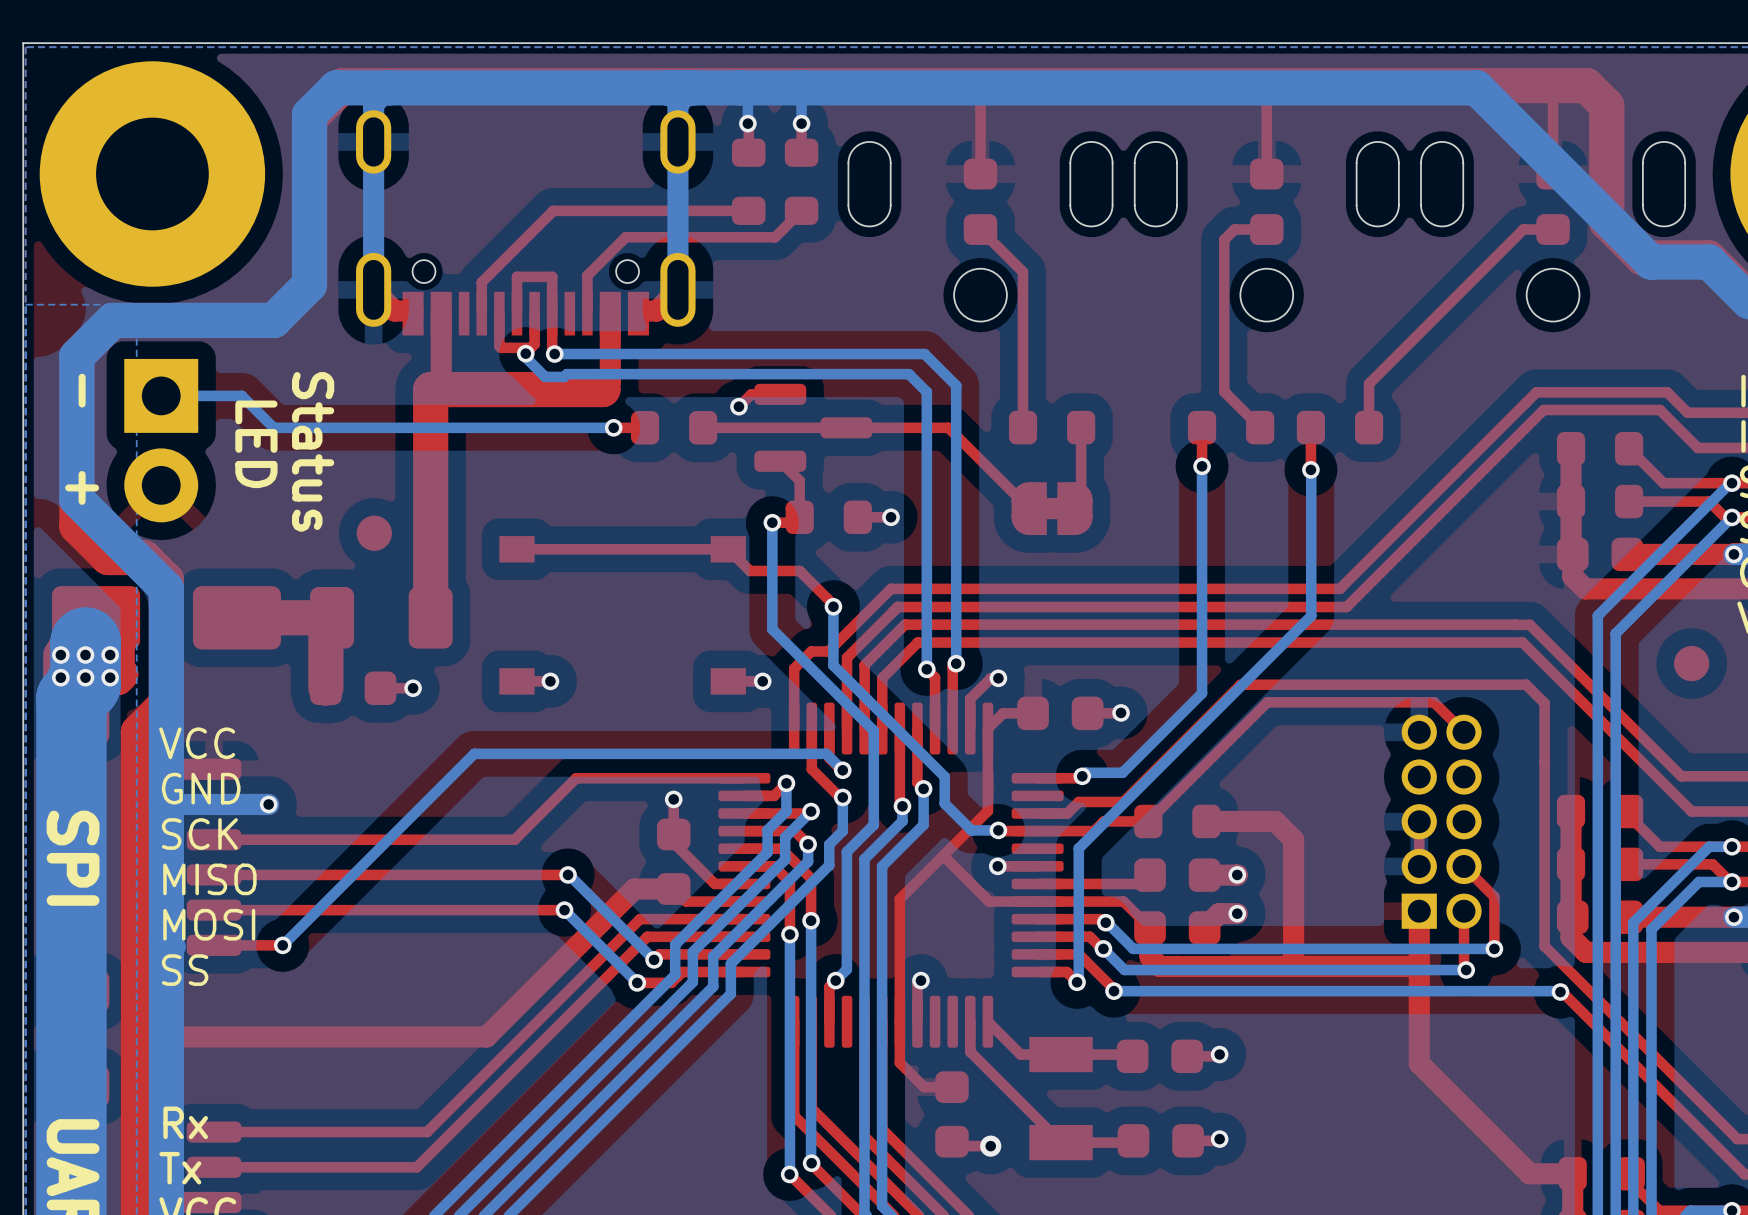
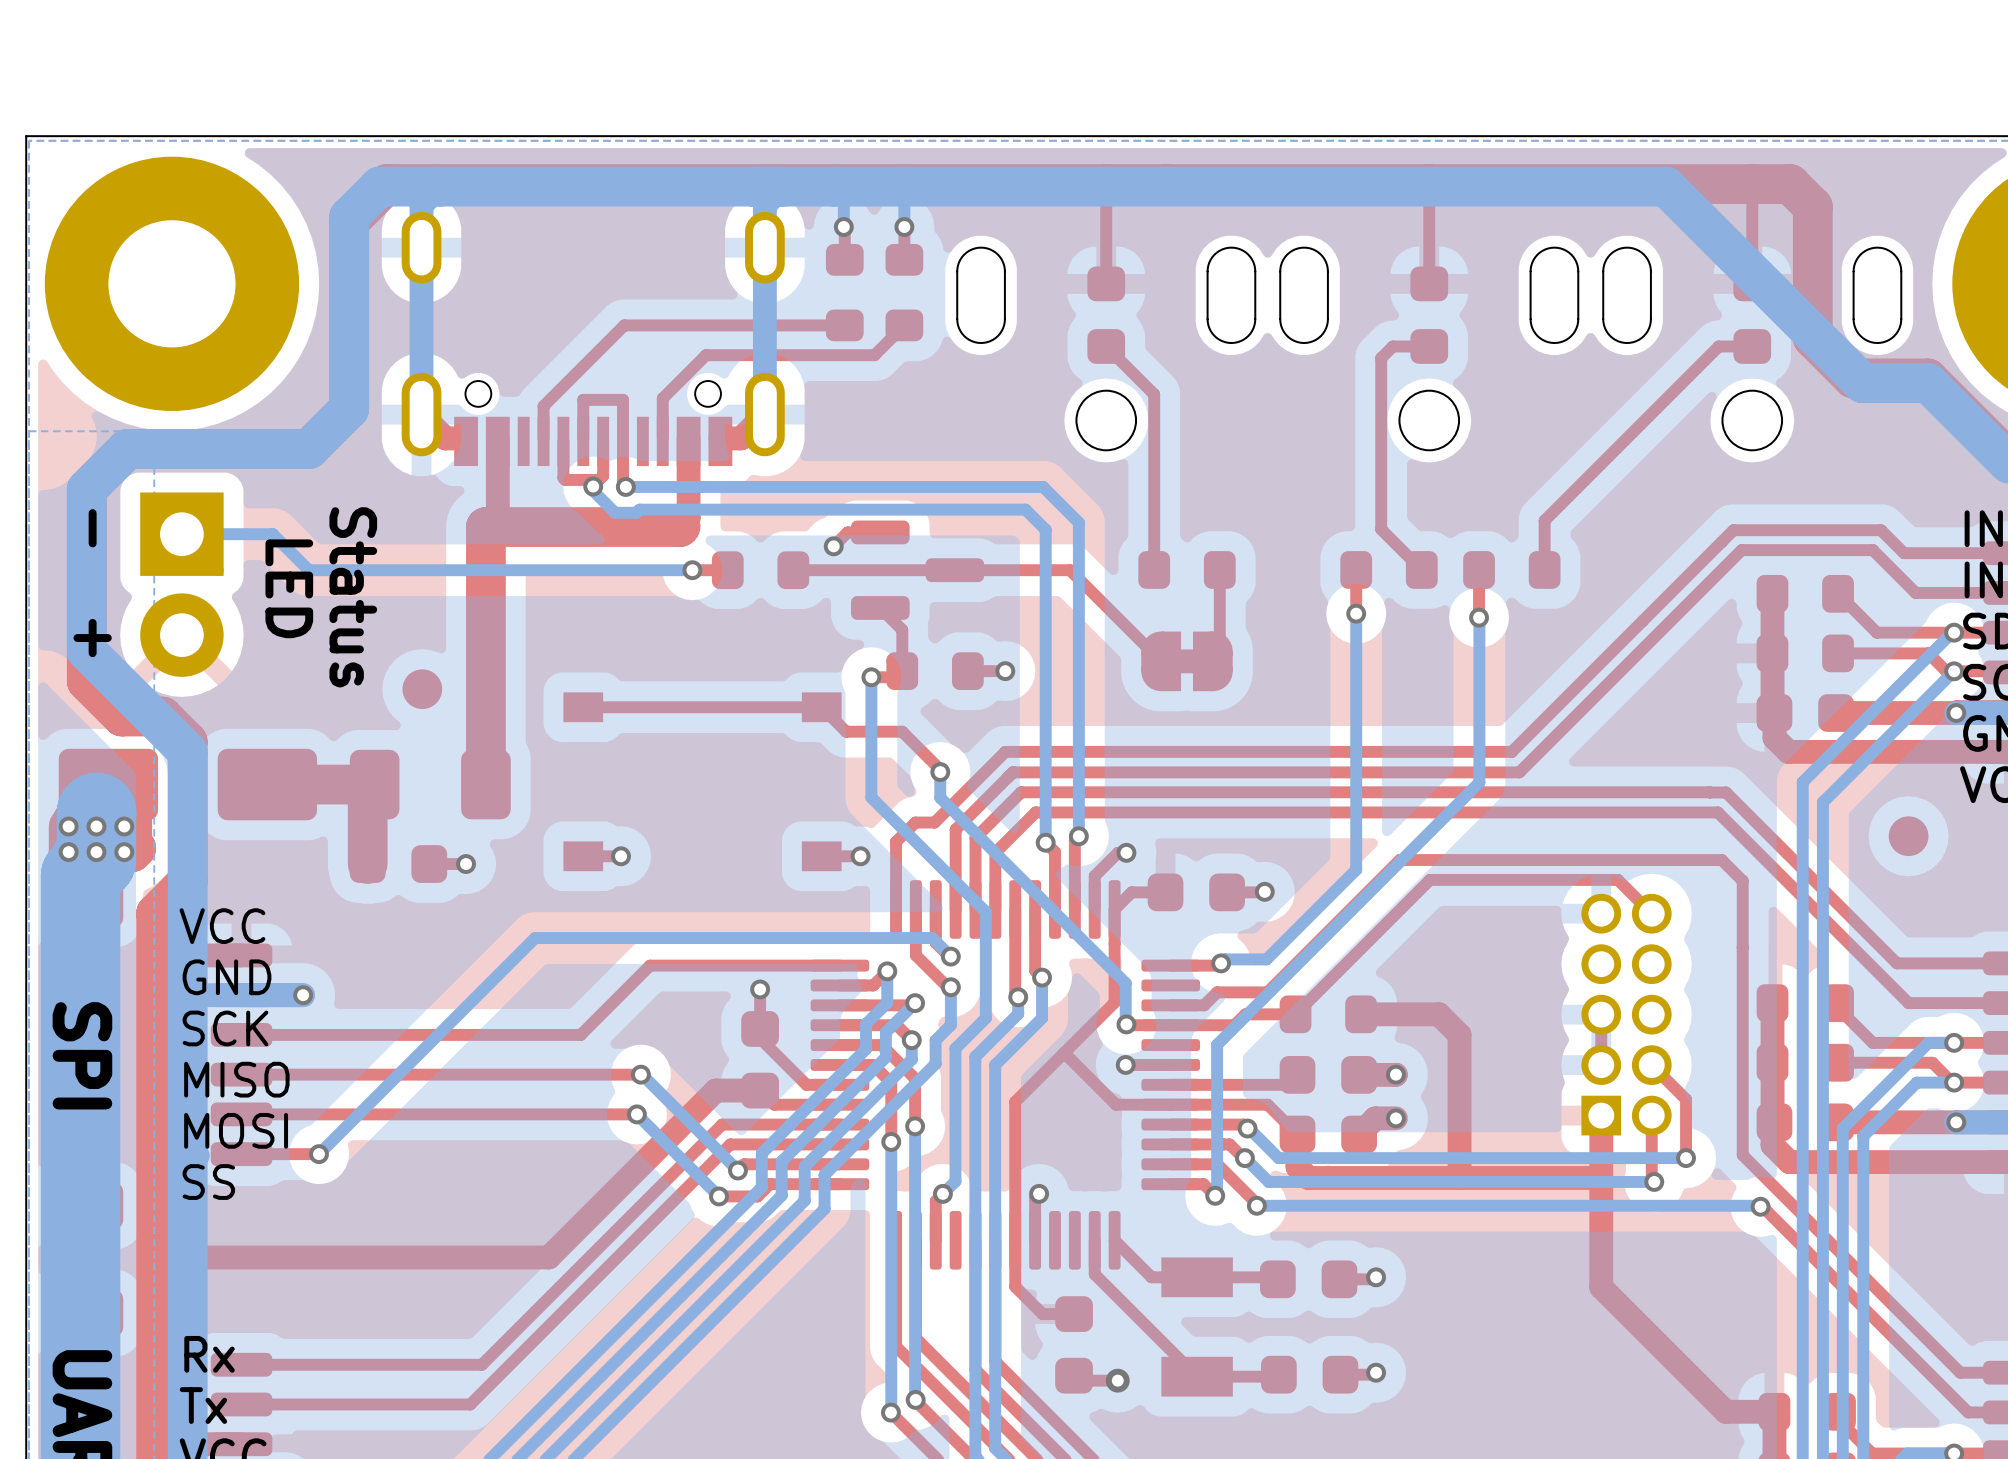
bottom track: (833, 629) (833, 665) (944, 776) (944, 803) (971, 830) (998, 830) -> (940, 797) (1125, 983) (1126, 1024)

